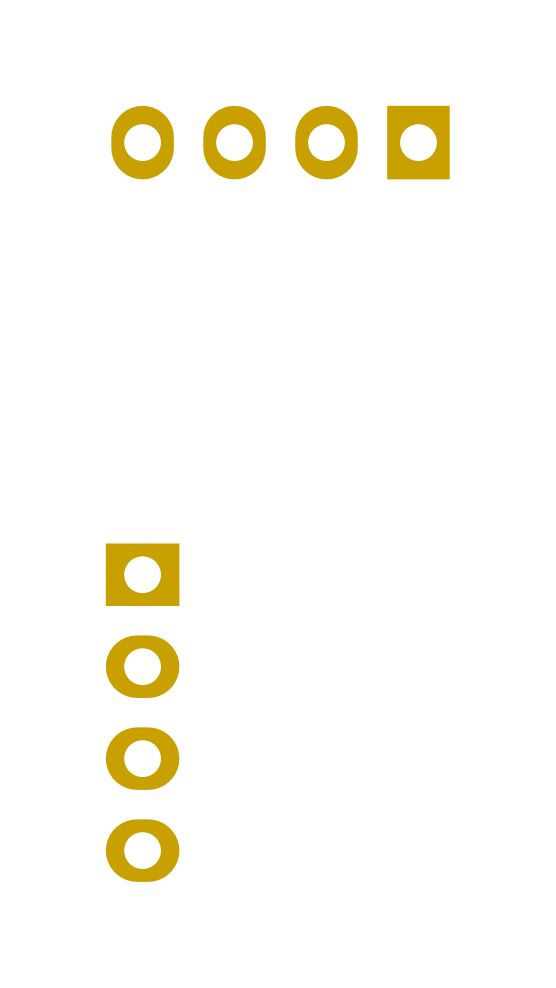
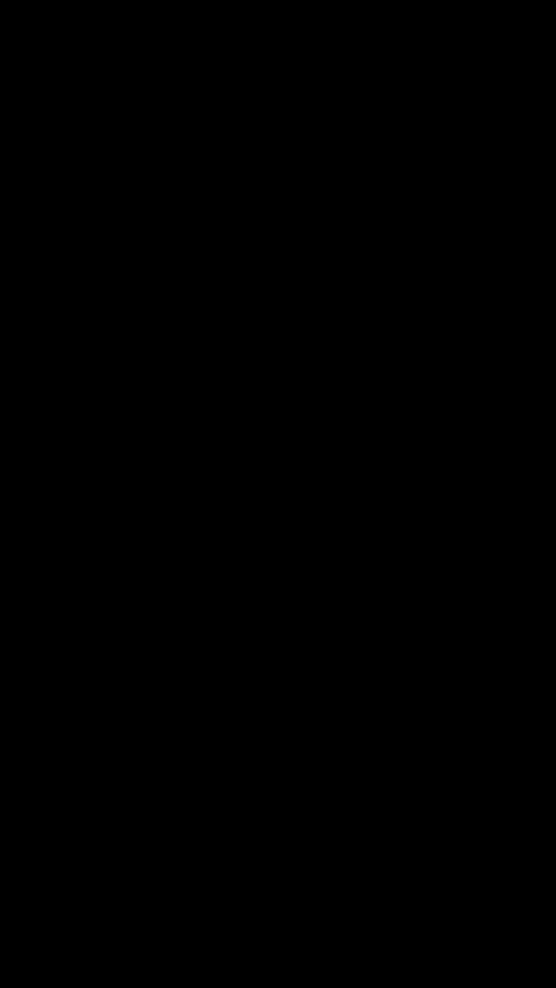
part: (280, 142) -> none
part: (142, 712) -> none

